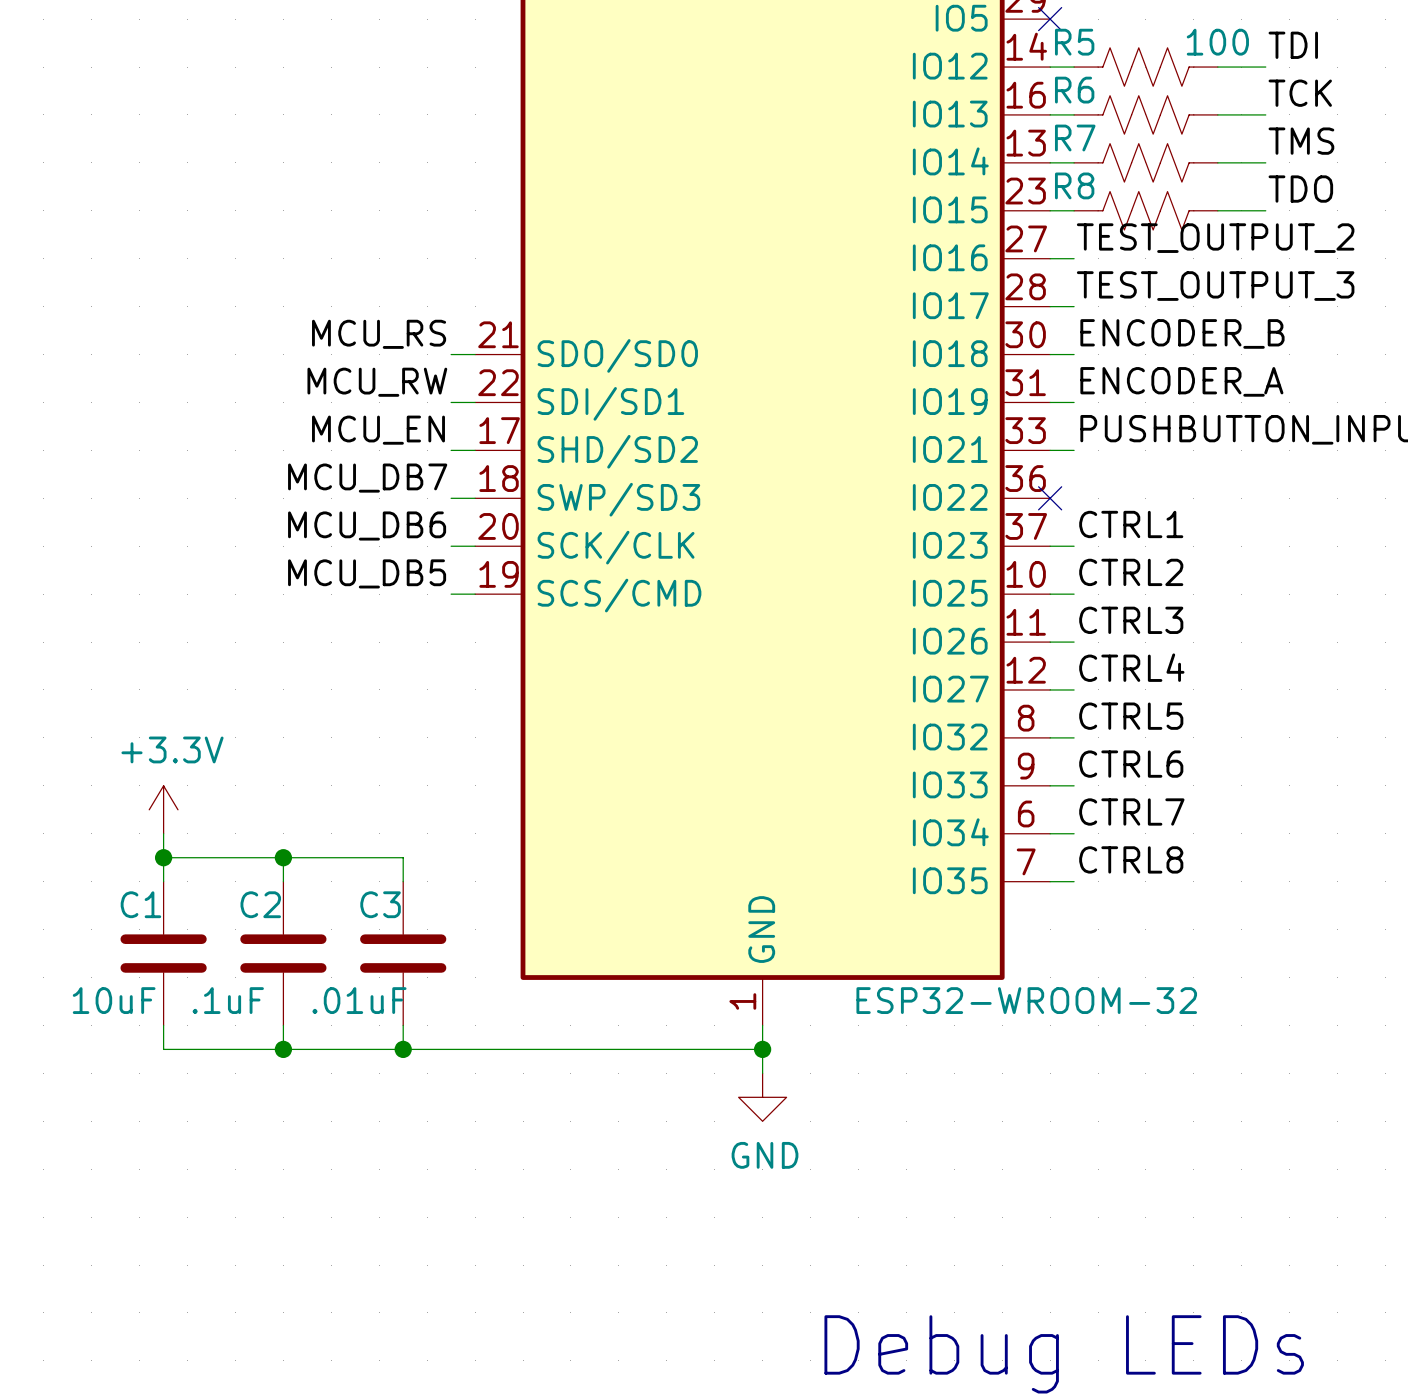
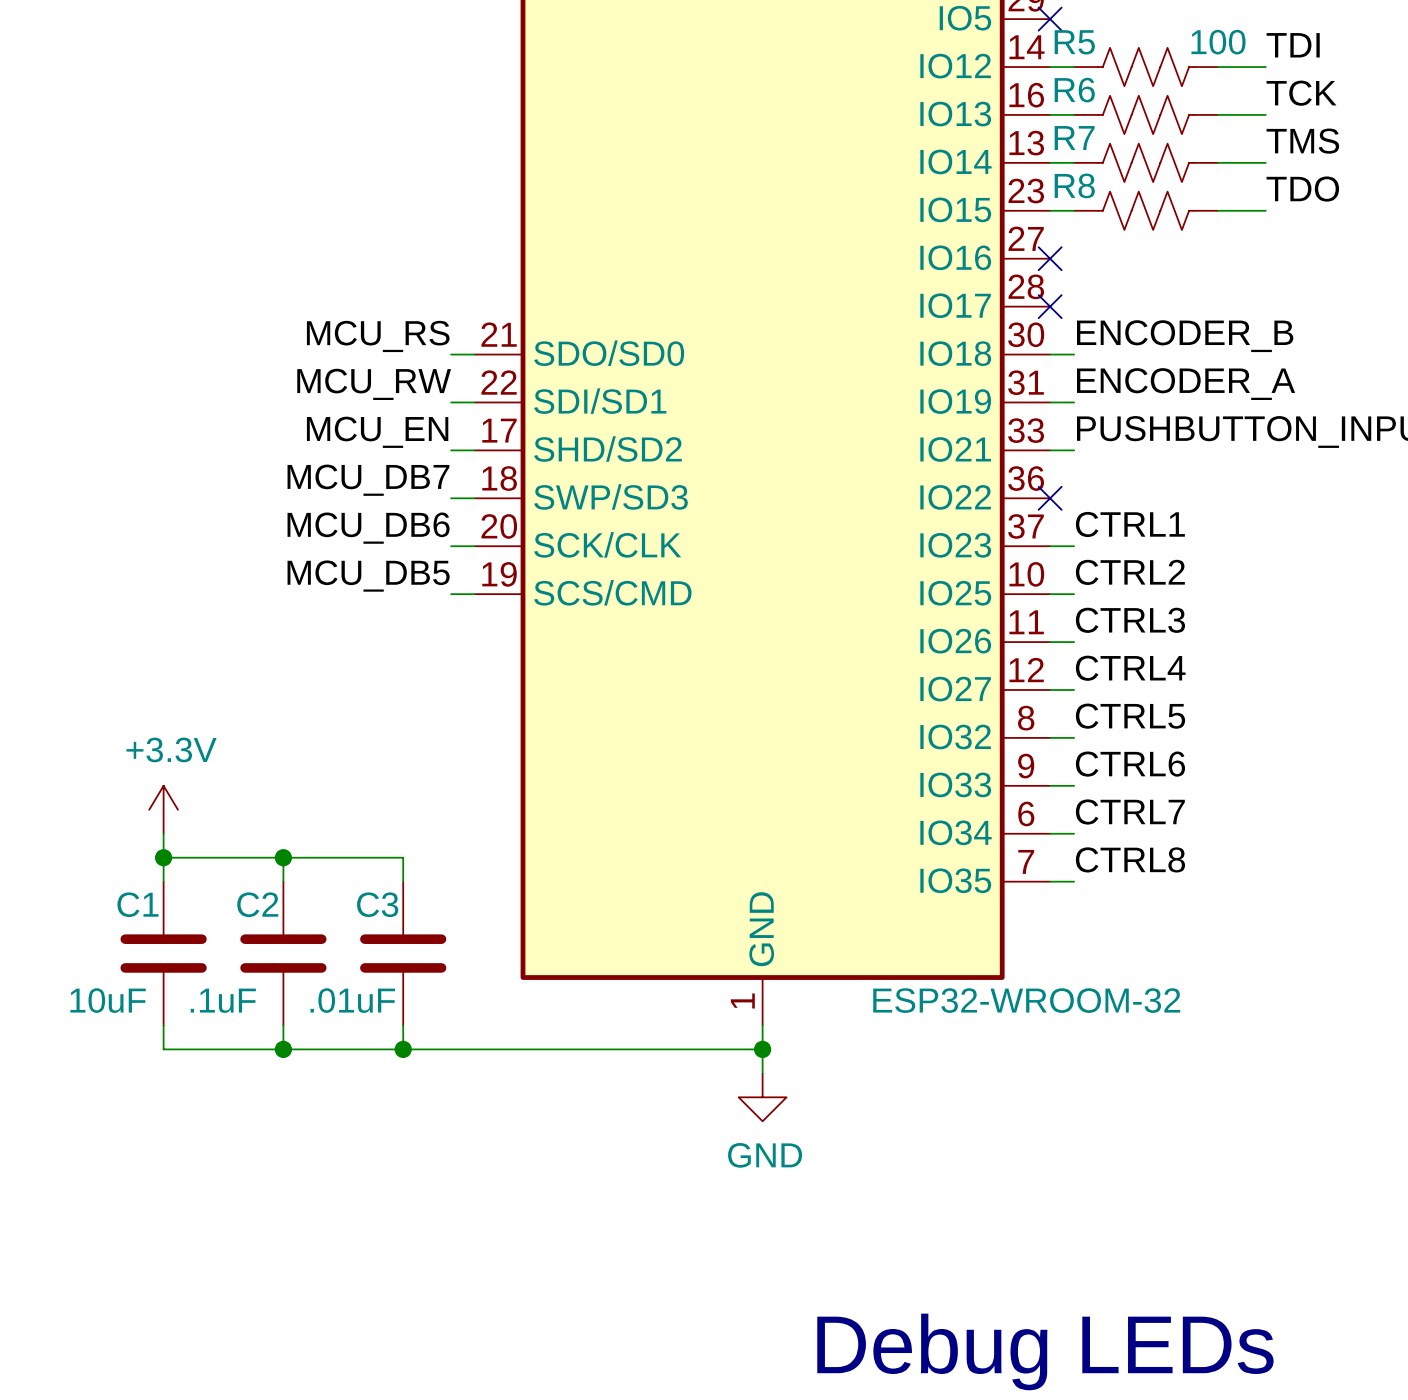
label: TEST_OUTPUT_2 (1215, 238) -> none
wire: (1050, 258) (1074, 258) -> none
no-connect mark: none -> (1050, 258)
label: TEST_OUTPUT_3 (1215, 286) -> none
wire: (1050, 306) (1074, 306) -> none
no-connect mark: none -> (1050, 306)

